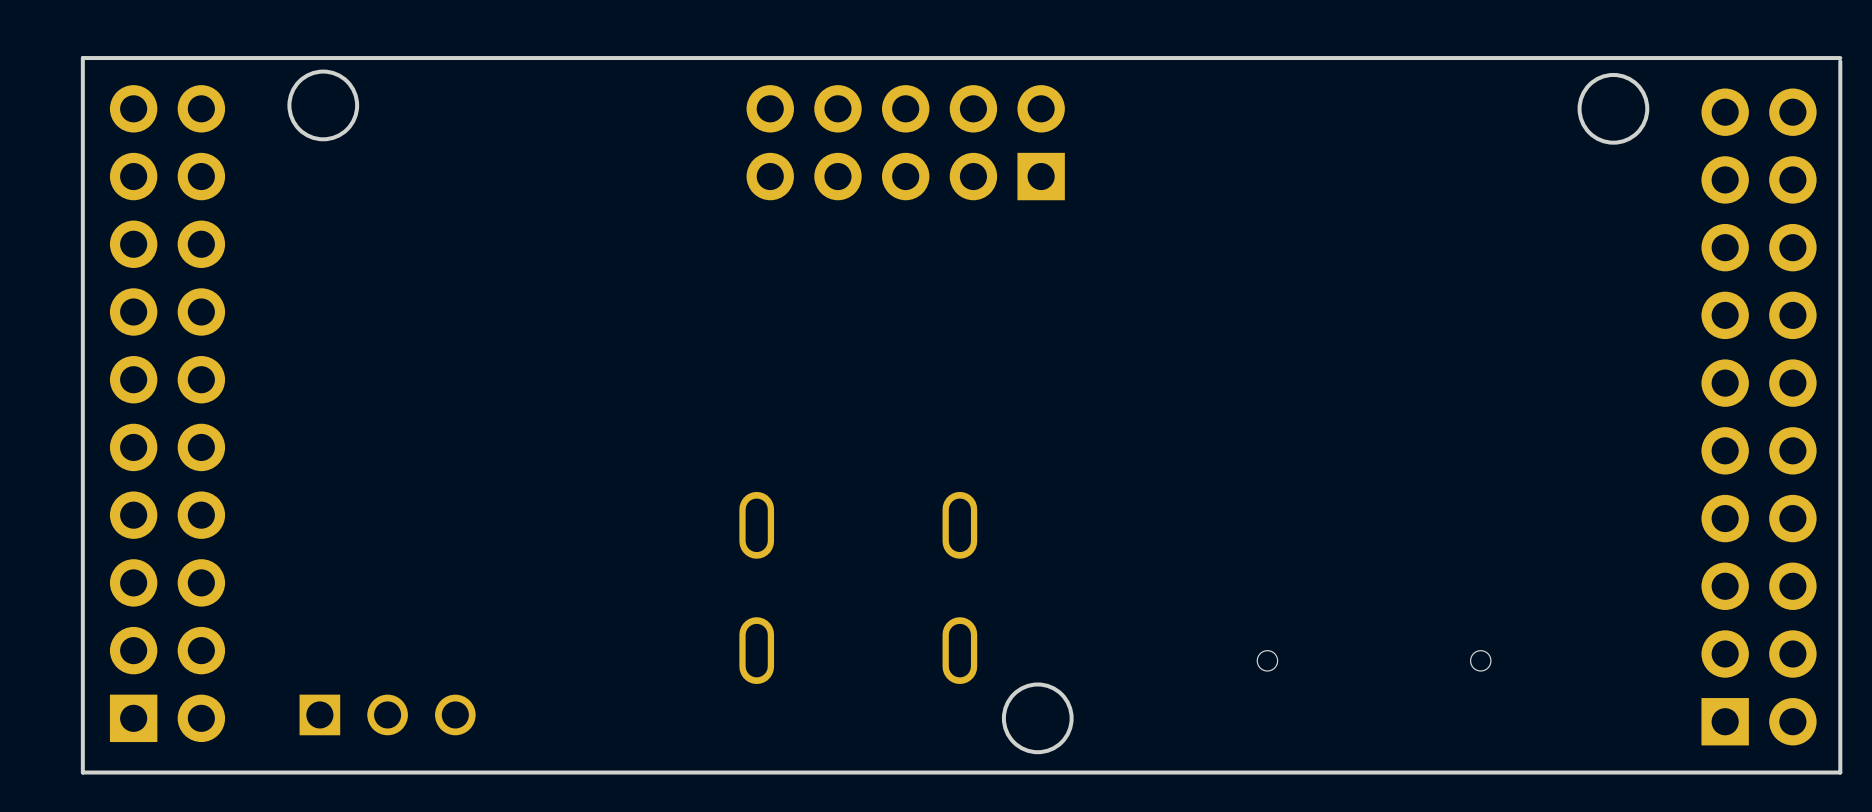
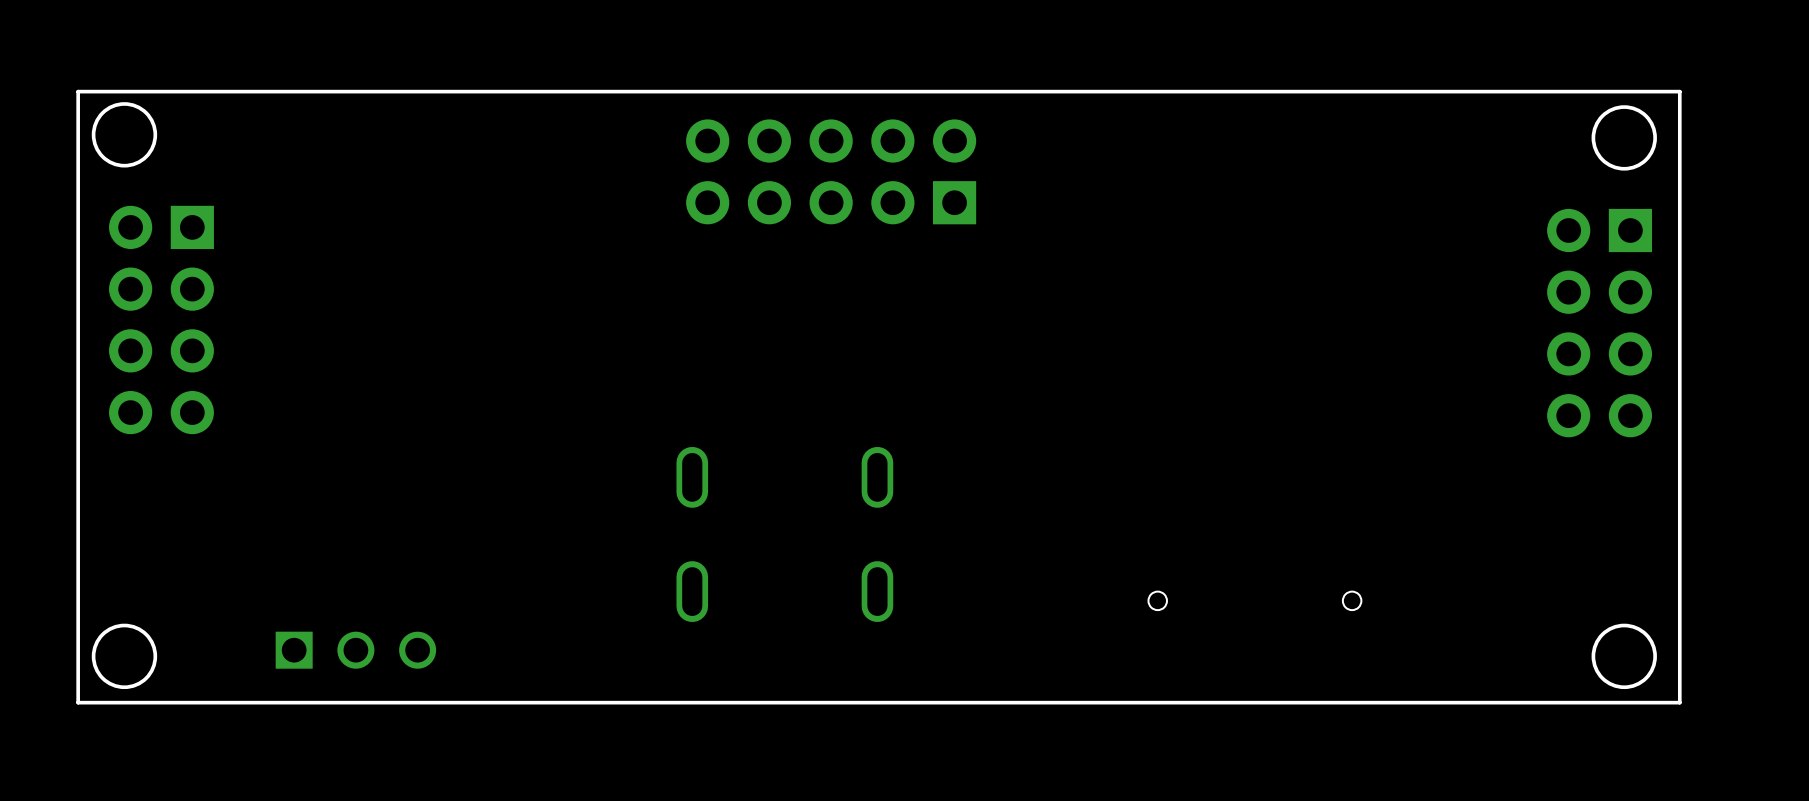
board edge: (1840, 58) (82, 58) (82, 102) -> (1679, 91) (78, 91)
board edge: (1840, 61) (1840, 102) -> none
round board edge position: (323, 105) -> (124, 134)
round board edge position: (1613, 108) -> (1624, 137)
part position: (905, 142) -> (831, 171)
part: none -> (161, 319)
part: none -> (1599, 323)
part: (167, 413) -> none
part: (1759, 416) -> none
round board edge: [1001, 682, 1074, 755] -> none
round board edge: none -> [91, 623, 158, 690]
round board edge: none -> [1591, 623, 1657, 690]

